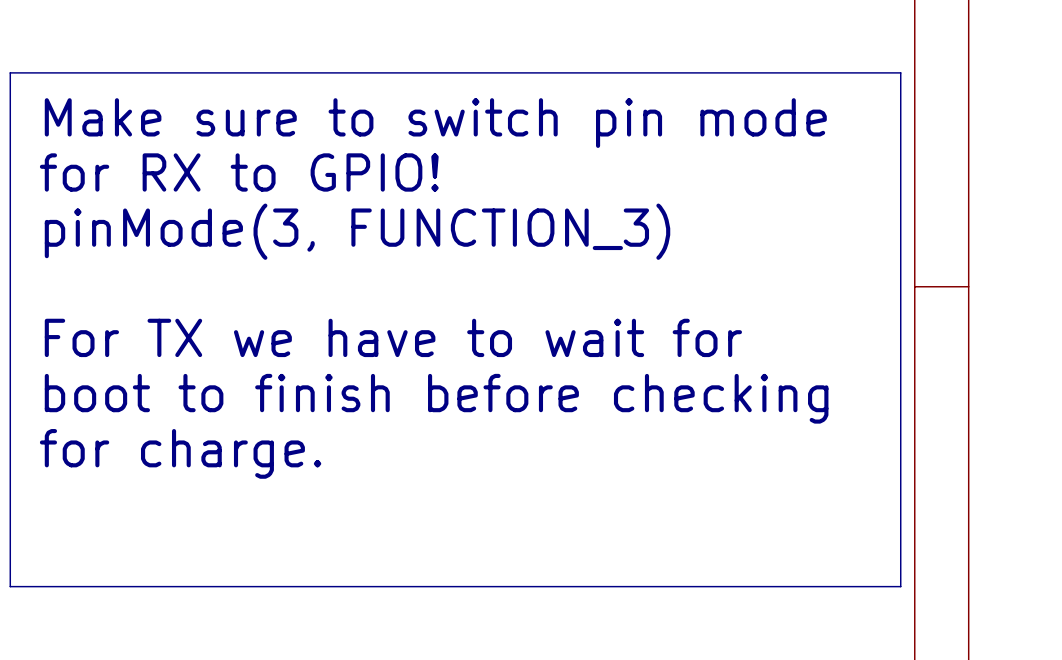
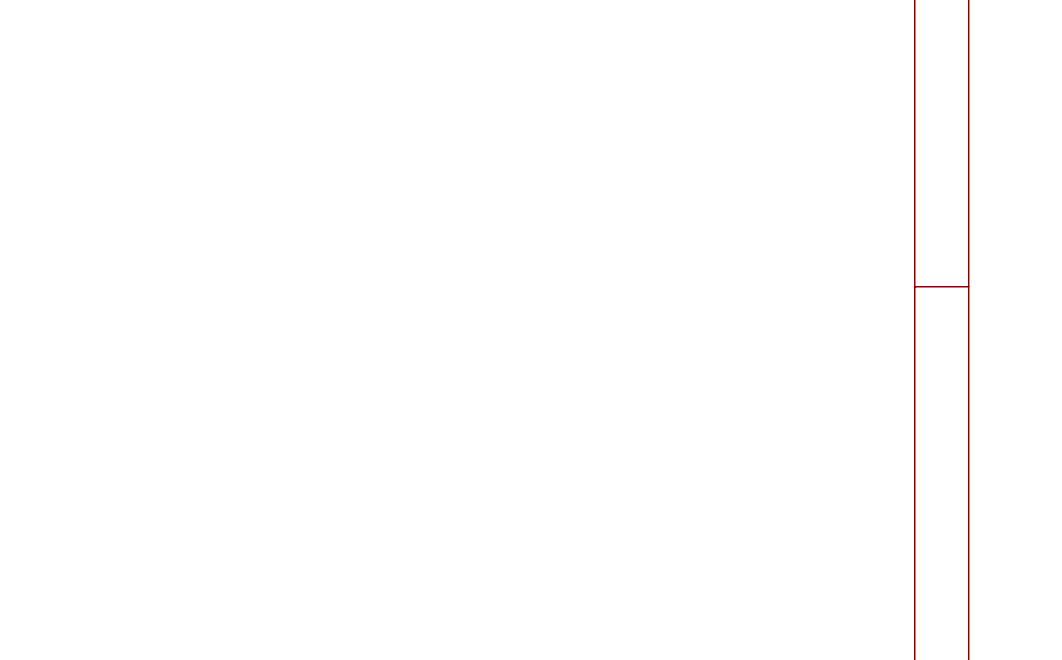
line: (10, 72) (900, 72) (900, 586) (10, 586) (10, 72) -> none
text: Make sure to switch pin mode (435, 123) -> none
text: for RX to GPIO! (239, 172) -> none
text: pinMode(3, FUNCTION_3) (357, 231) -> none
text: For TX we have to wait for (393, 337) -> none
text: boot to finish before checking (436, 398) -> none
text: for charge. (180, 453) -> none

